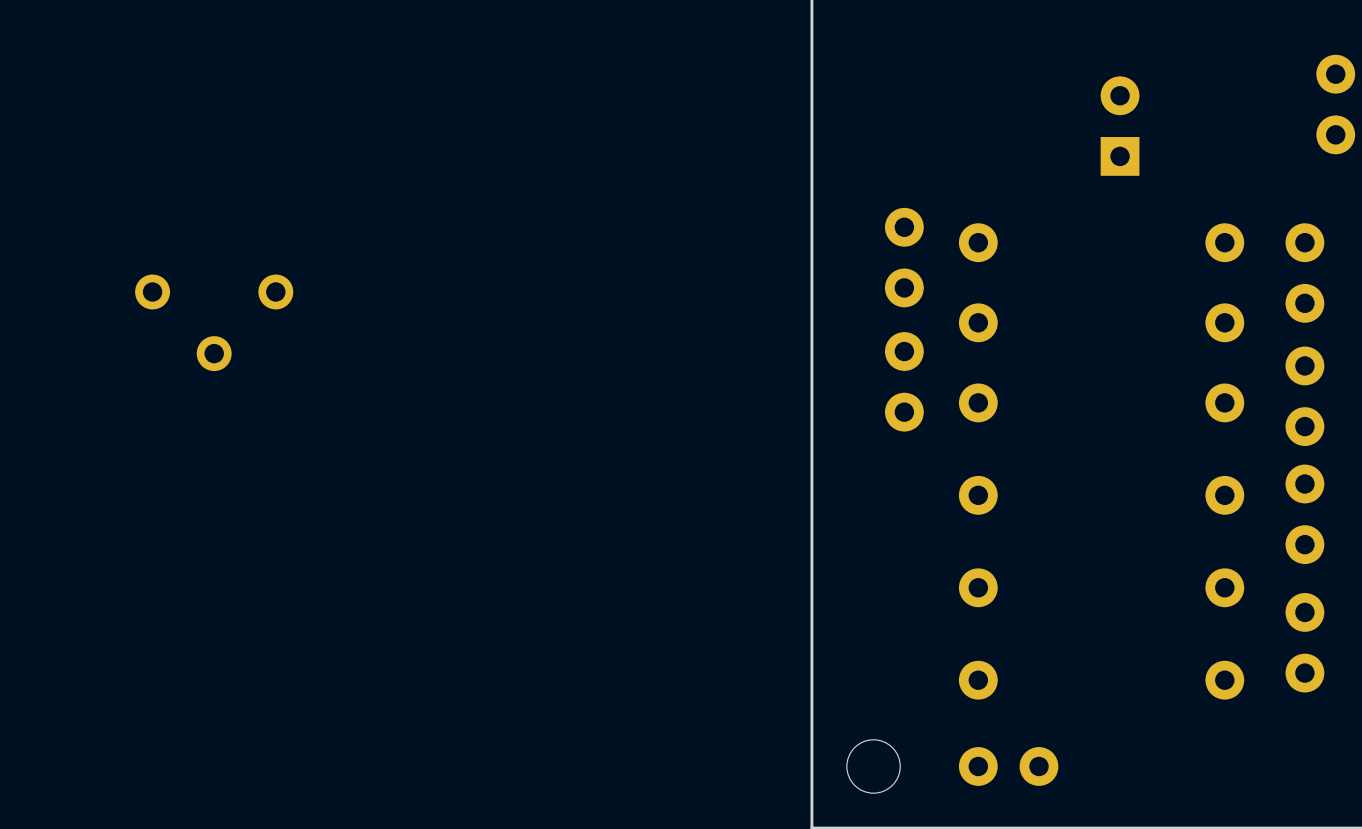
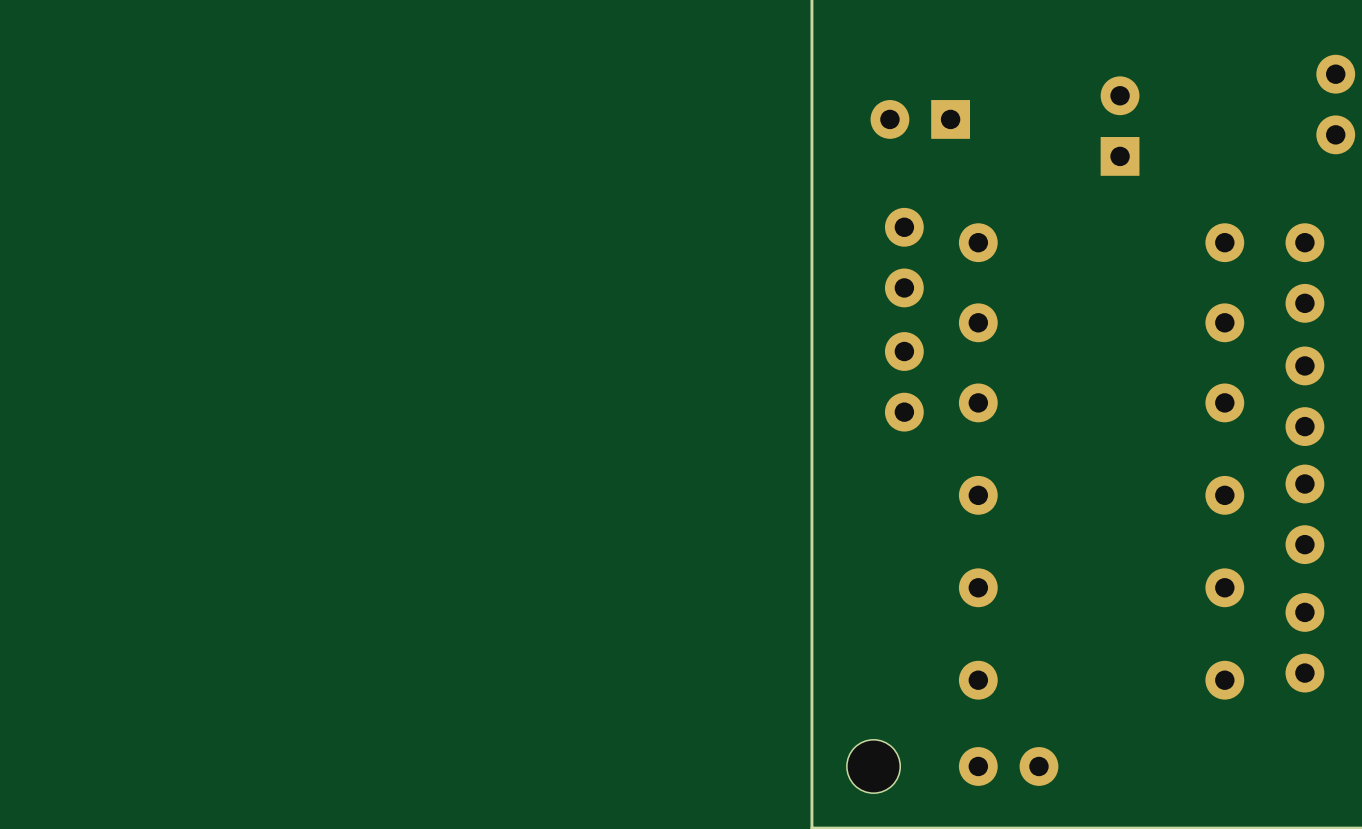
part: none -> (920, 119)
part: (214, 322) -> none

